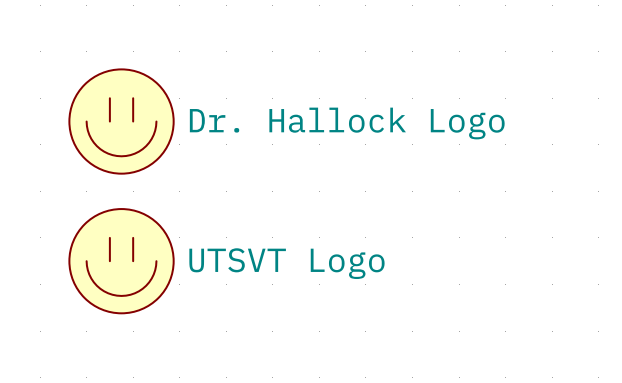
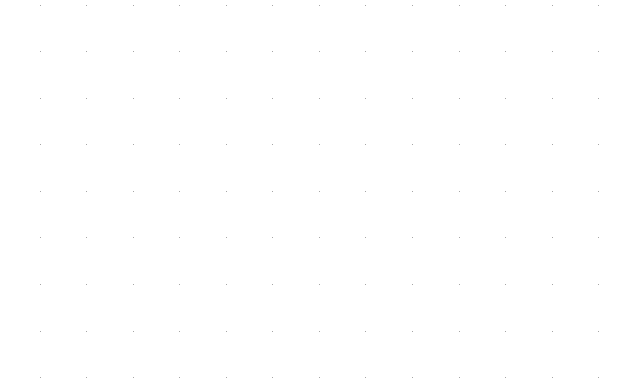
part: Dr. Hallock Logo (121, 121) -> none
part: UTSVT Logo (121, 261) -> none

